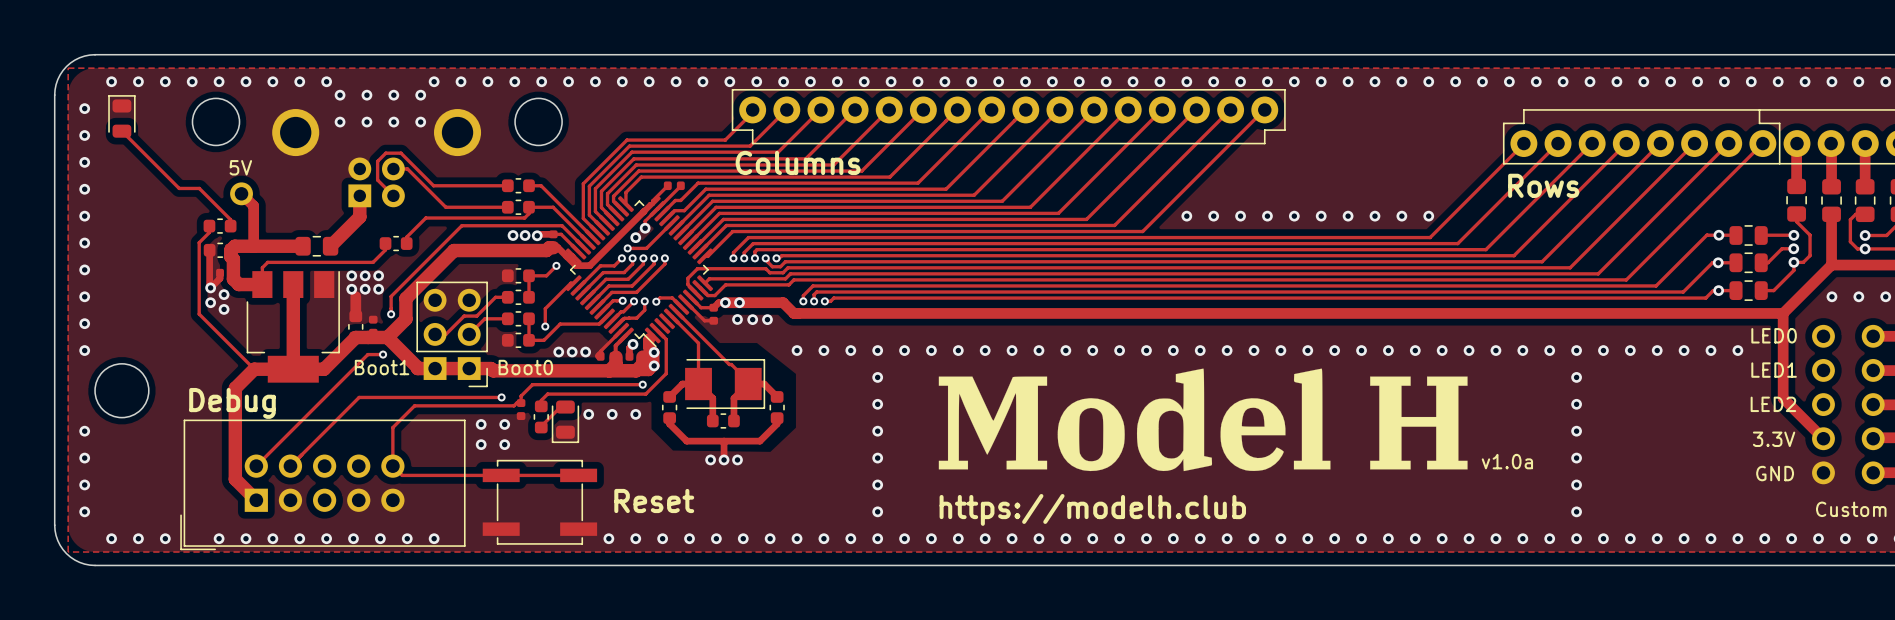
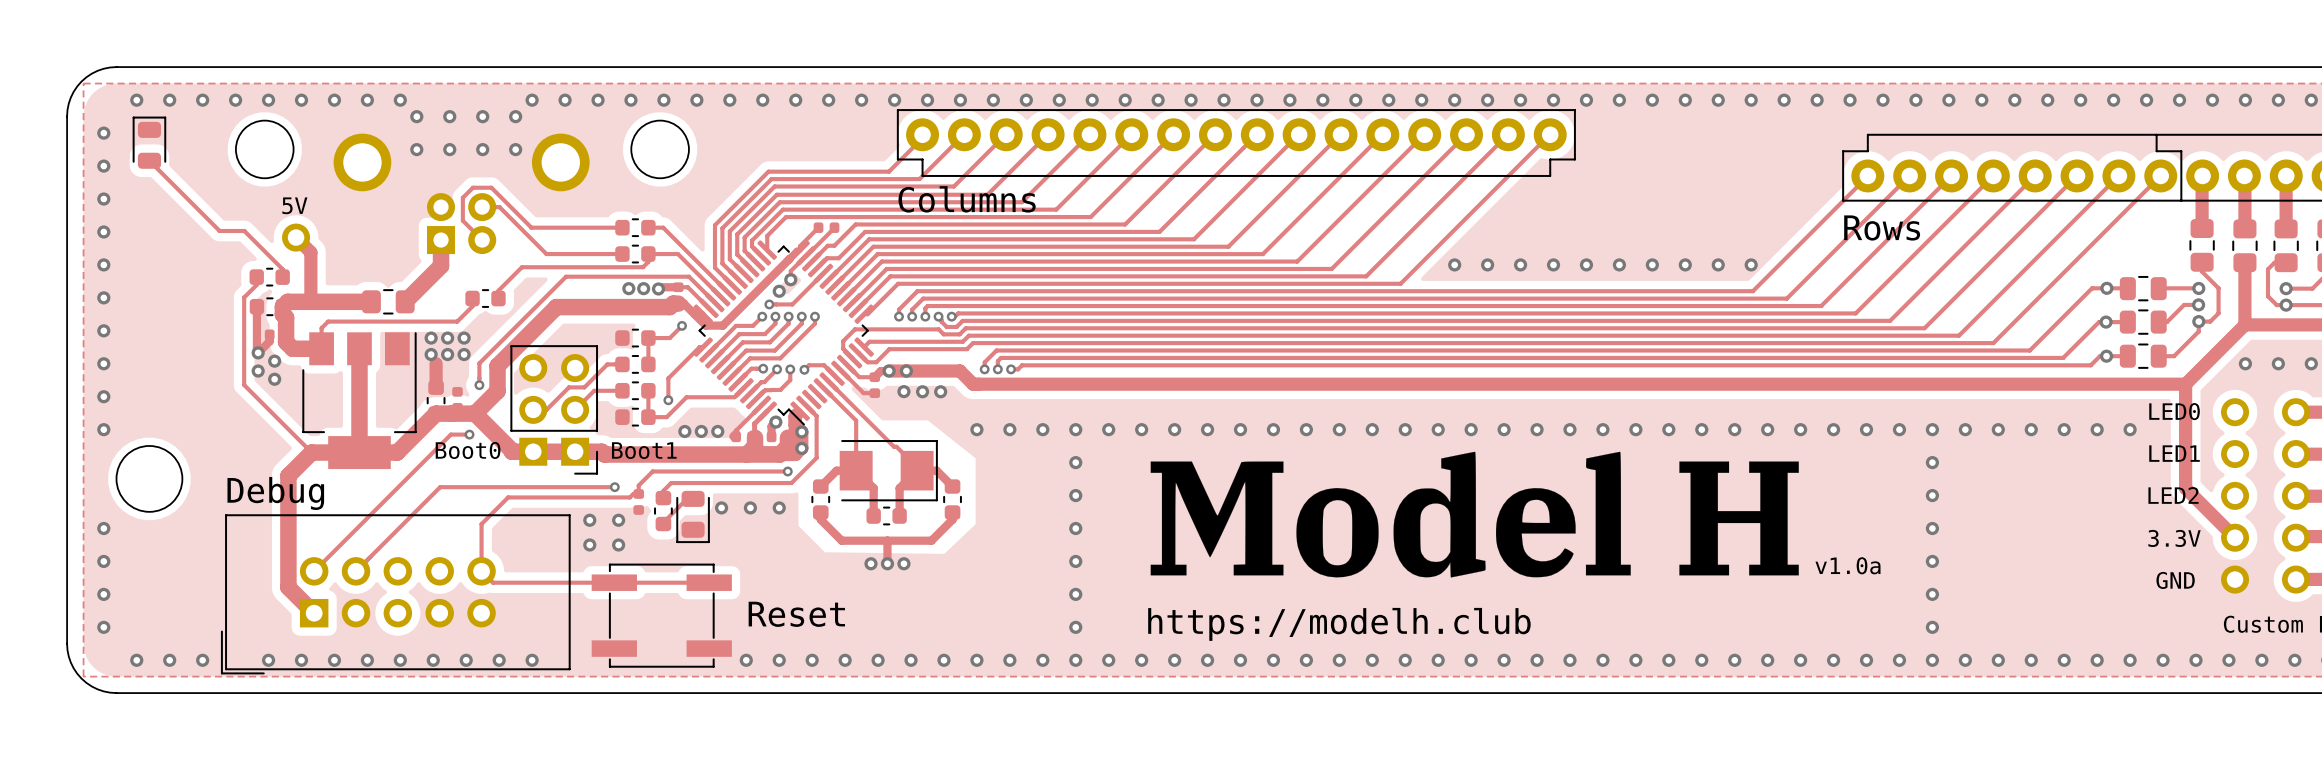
text: Boot1 (382, 367) -> Boot0 (468, 450)
text: Boot0 (525, 367) -> Boot1 (644, 450)

